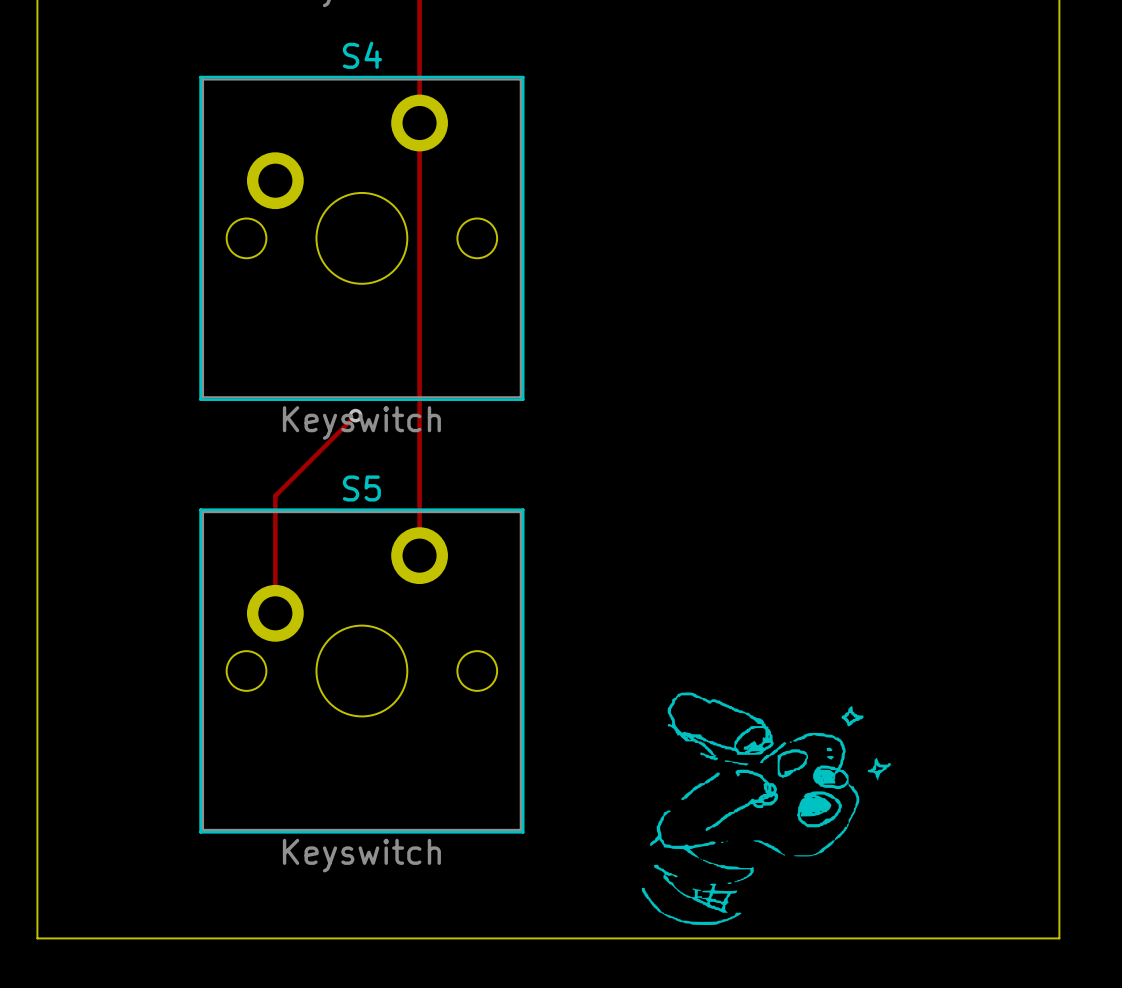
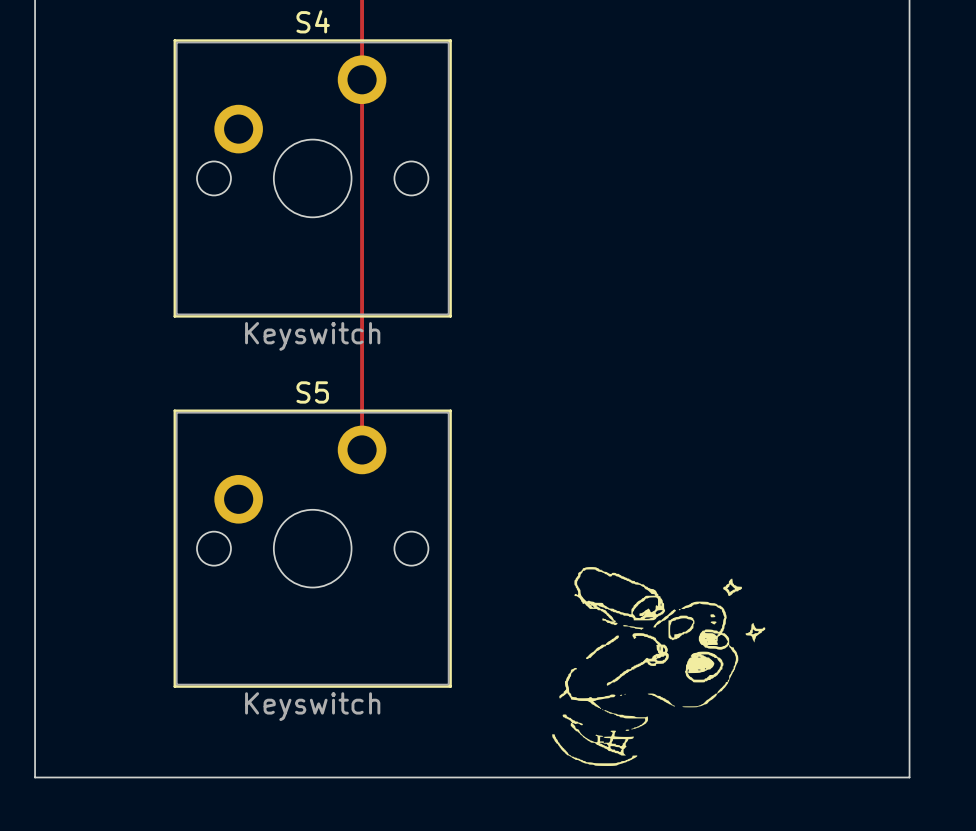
track: (355, 415) (275, 495) (275, 613) -> none
via: (355, 415) -> none

